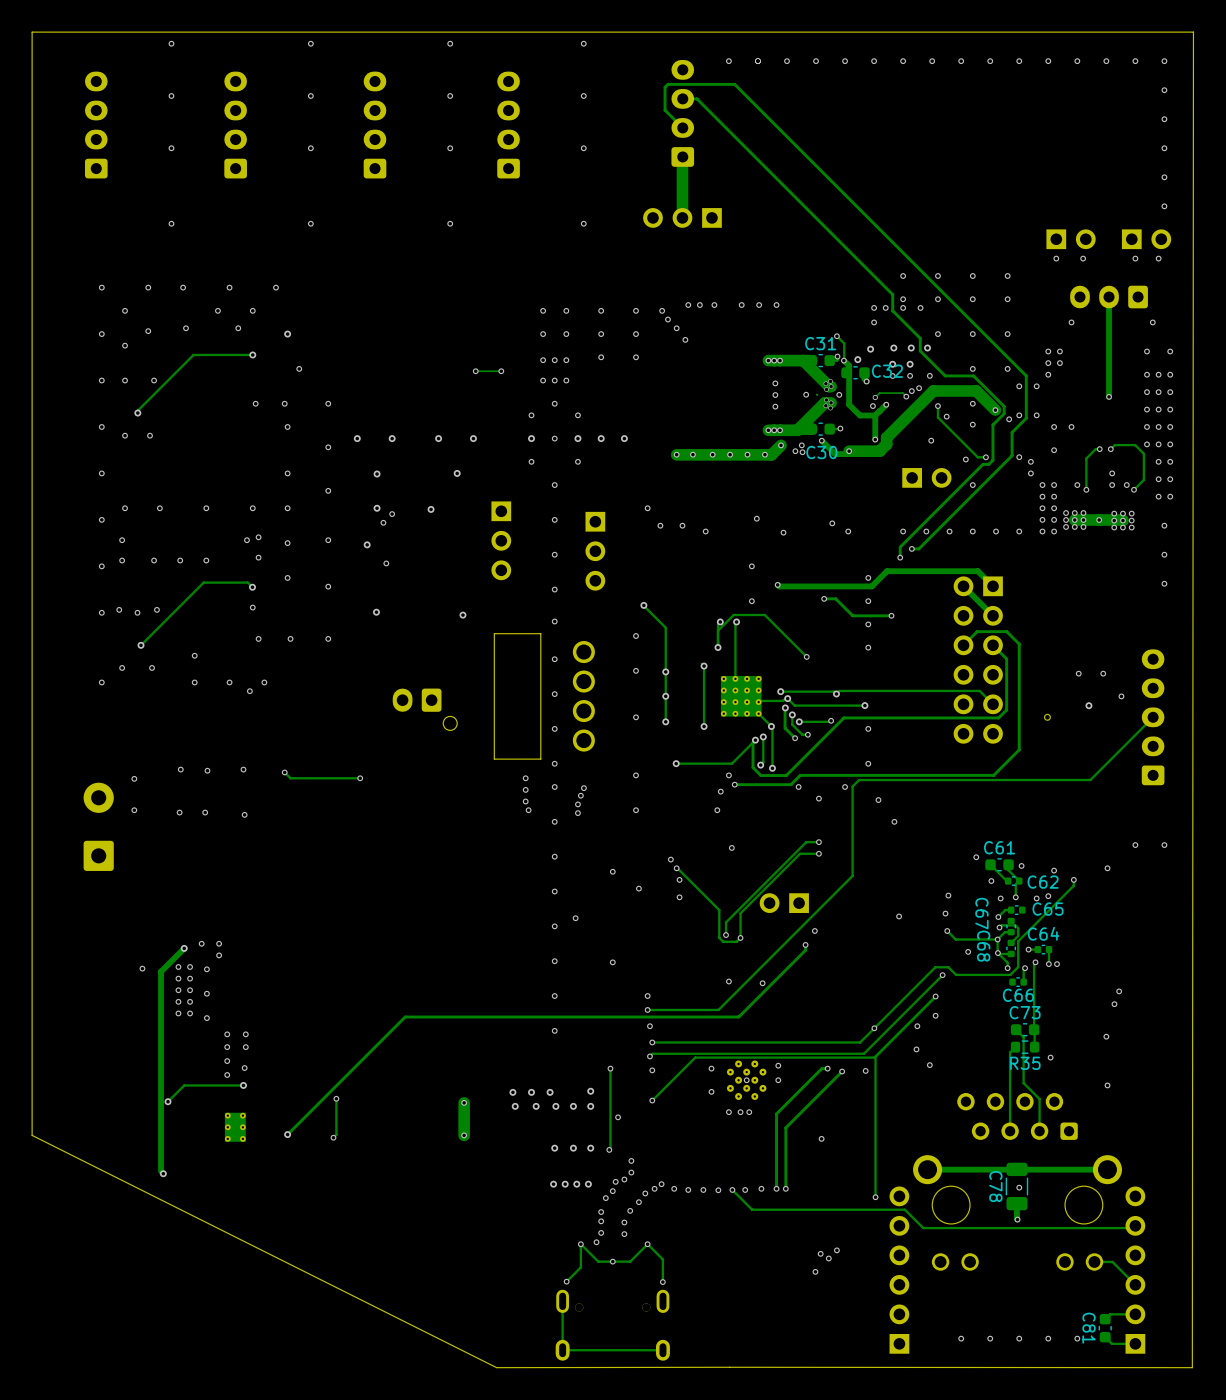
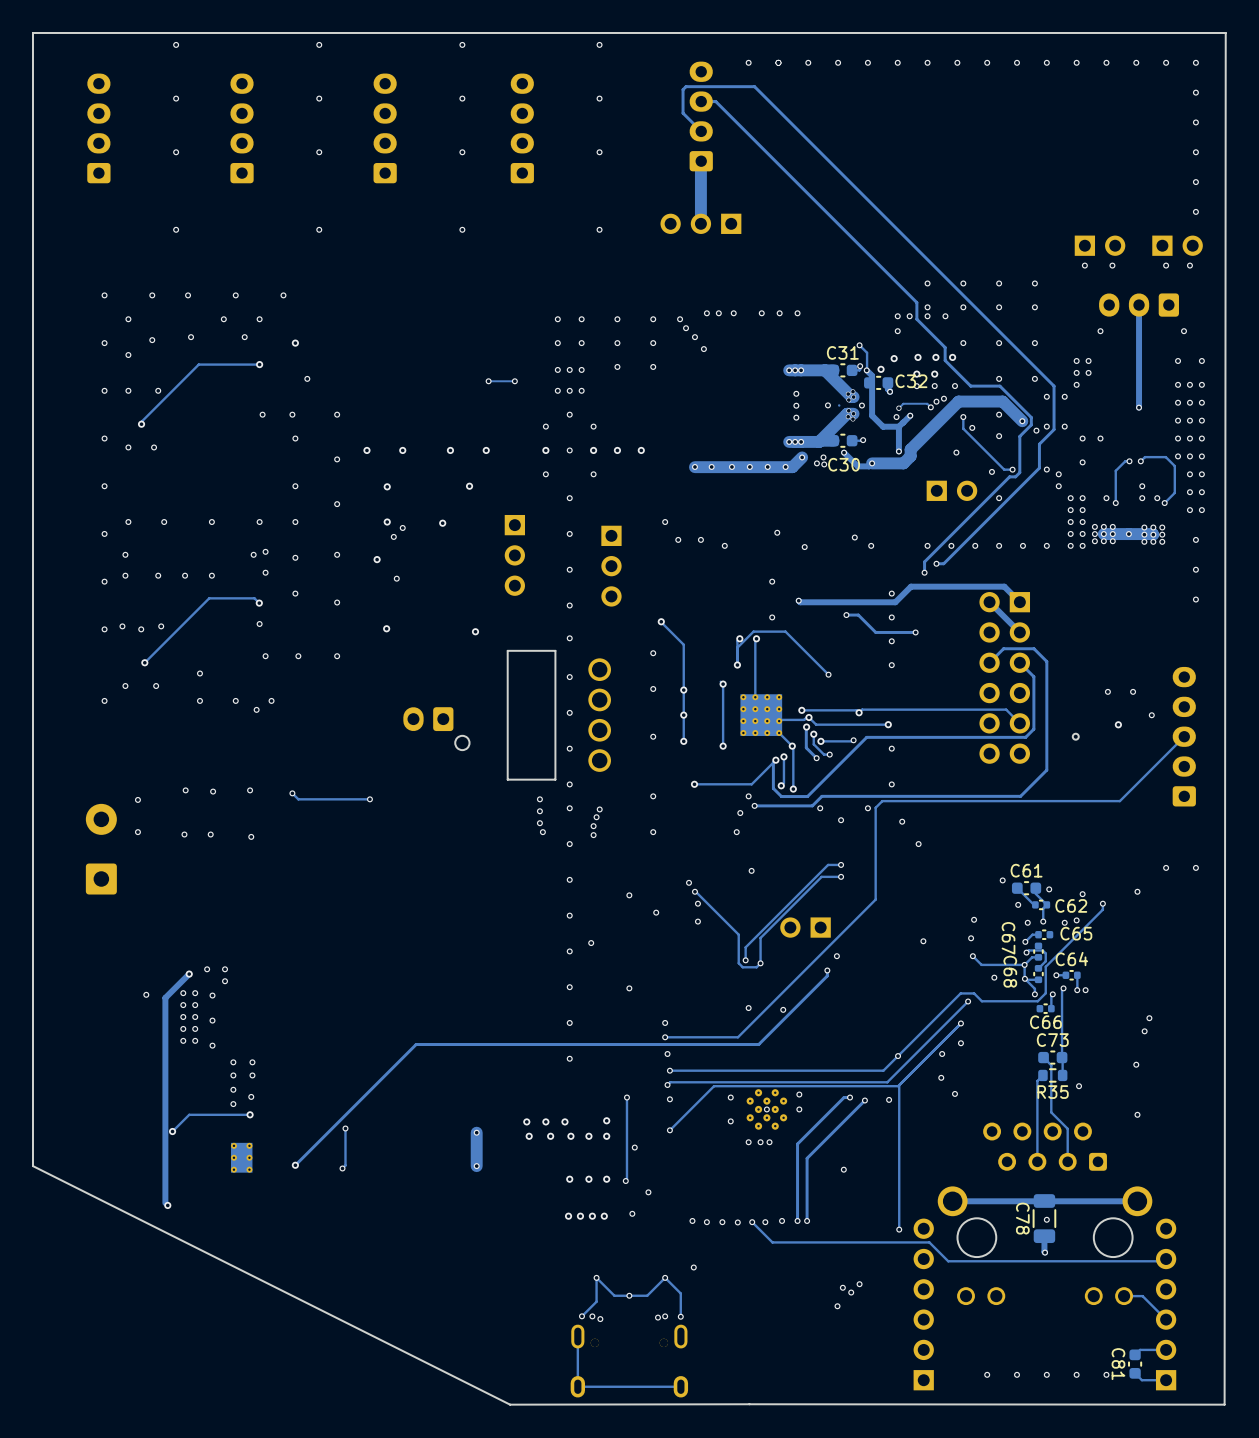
via: (631, 1172) -> none
via: (624, 1179) -> none
via: (661, 1184) -> none
via: (654, 1188) -> none
via: (612, 1191) -> none
via: (645, 1193) -> none
via: (605, 1198) -> none
via: (638, 1202) -> none
via: (630, 1210) -> none
via: (601, 1212) -> none
via: (601, 1221) -> none
via: (624, 1222) -> none
via: (601, 1232) -> none
via: (624, 1234) -> none
via: none -> (693, 1267)
via: (596, 1242) -> none
via: none -> (592, 1316)
via: none -> (665, 1316)
via: none -> (657, 1317)
via: none -> (600, 1319)

